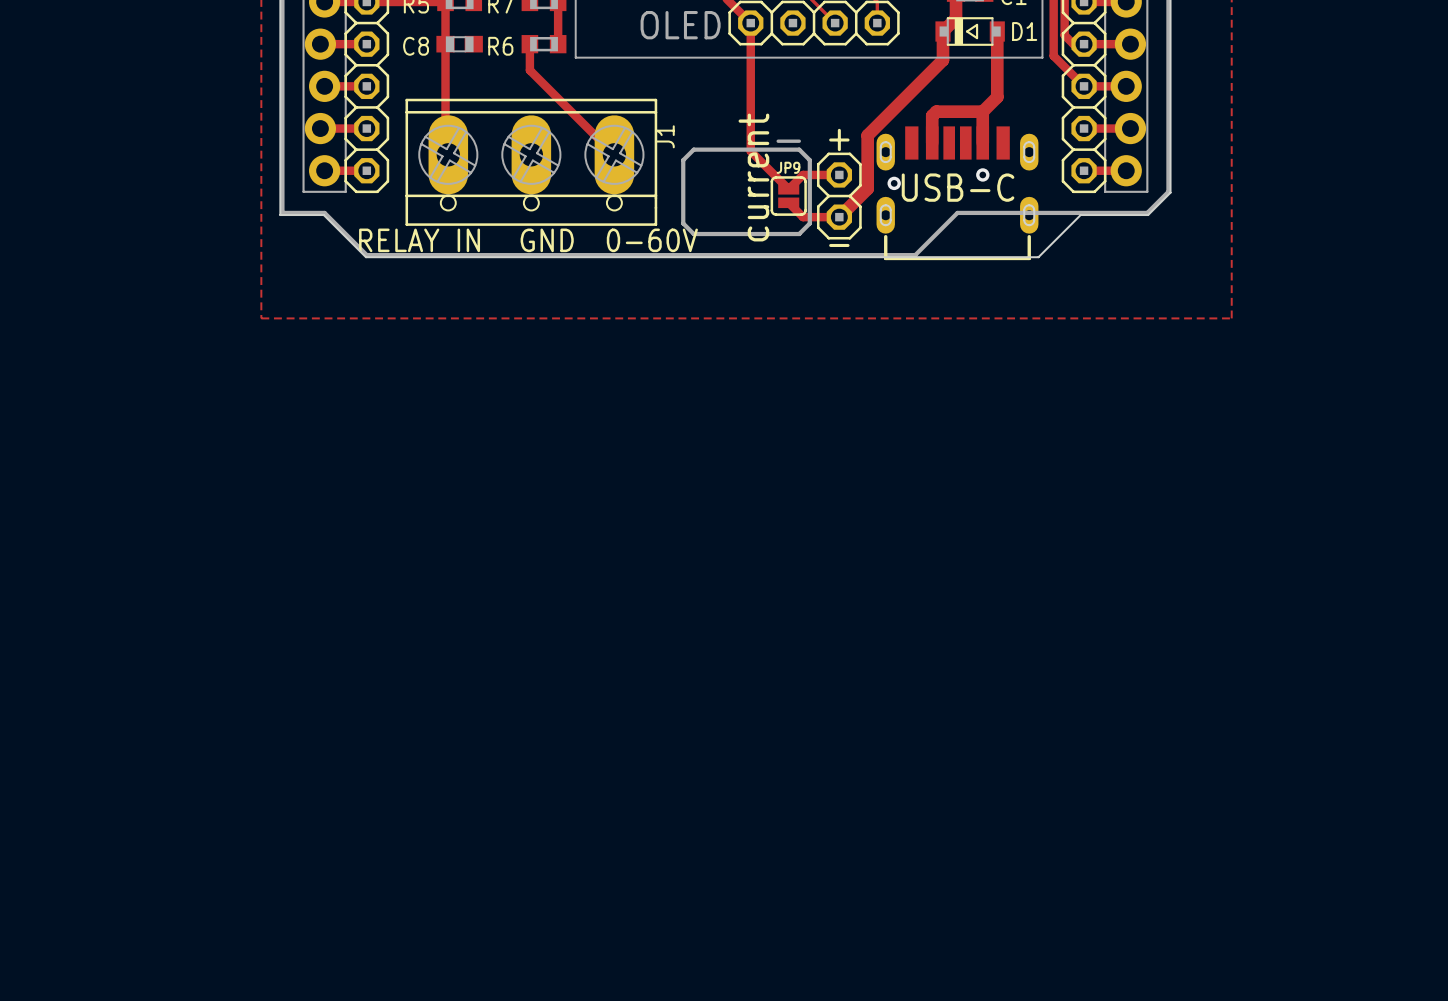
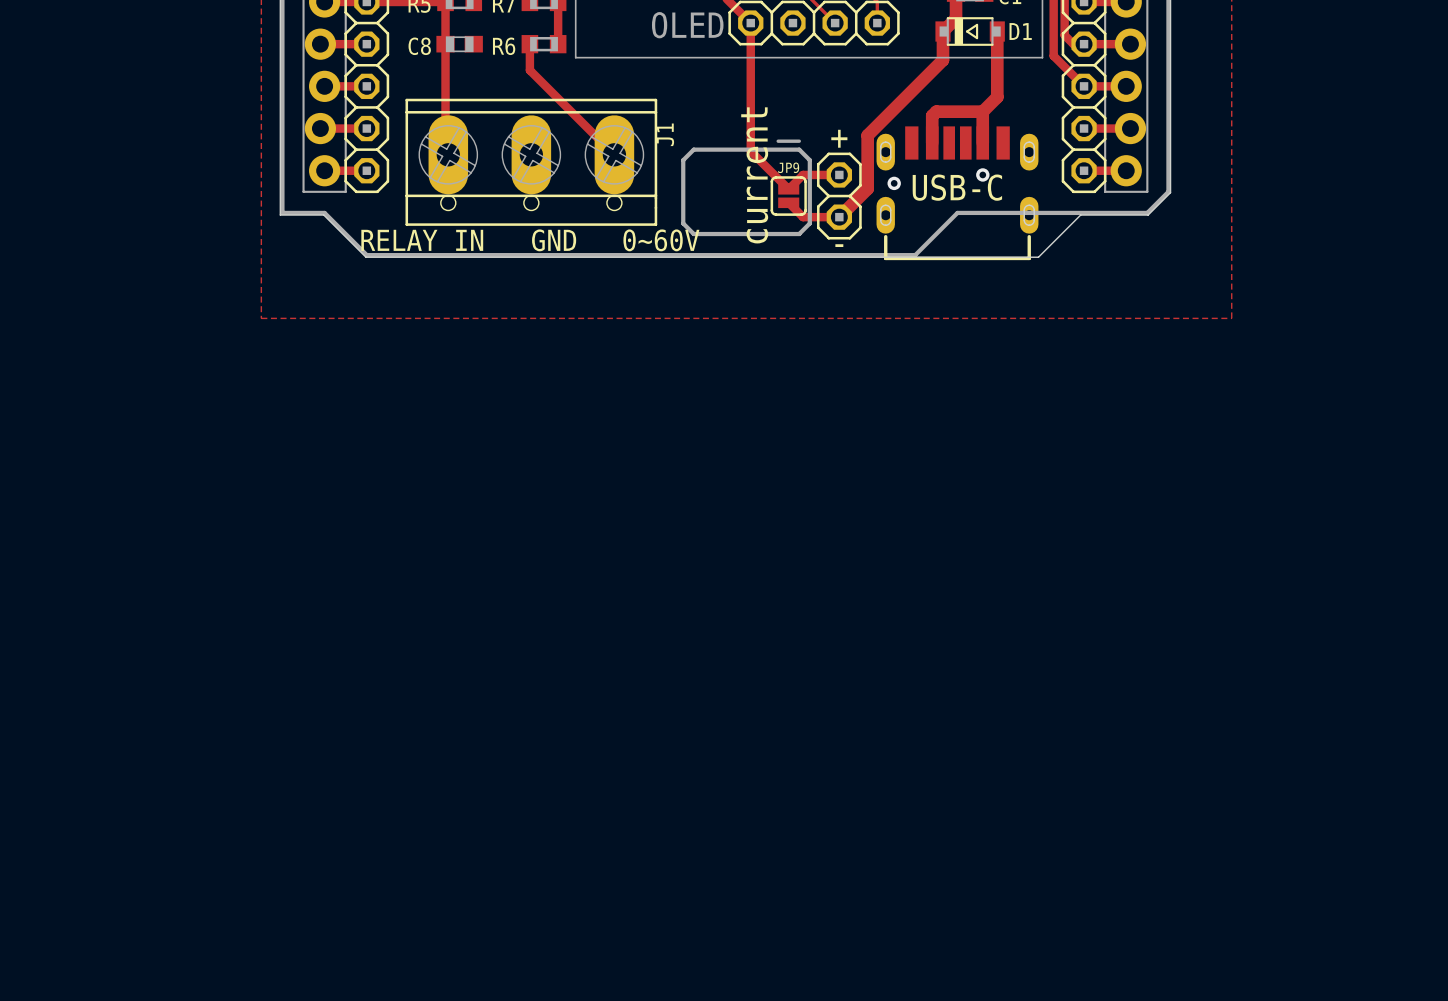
text: 0-60V (652, 240) -> 0~60V (661, 240)

